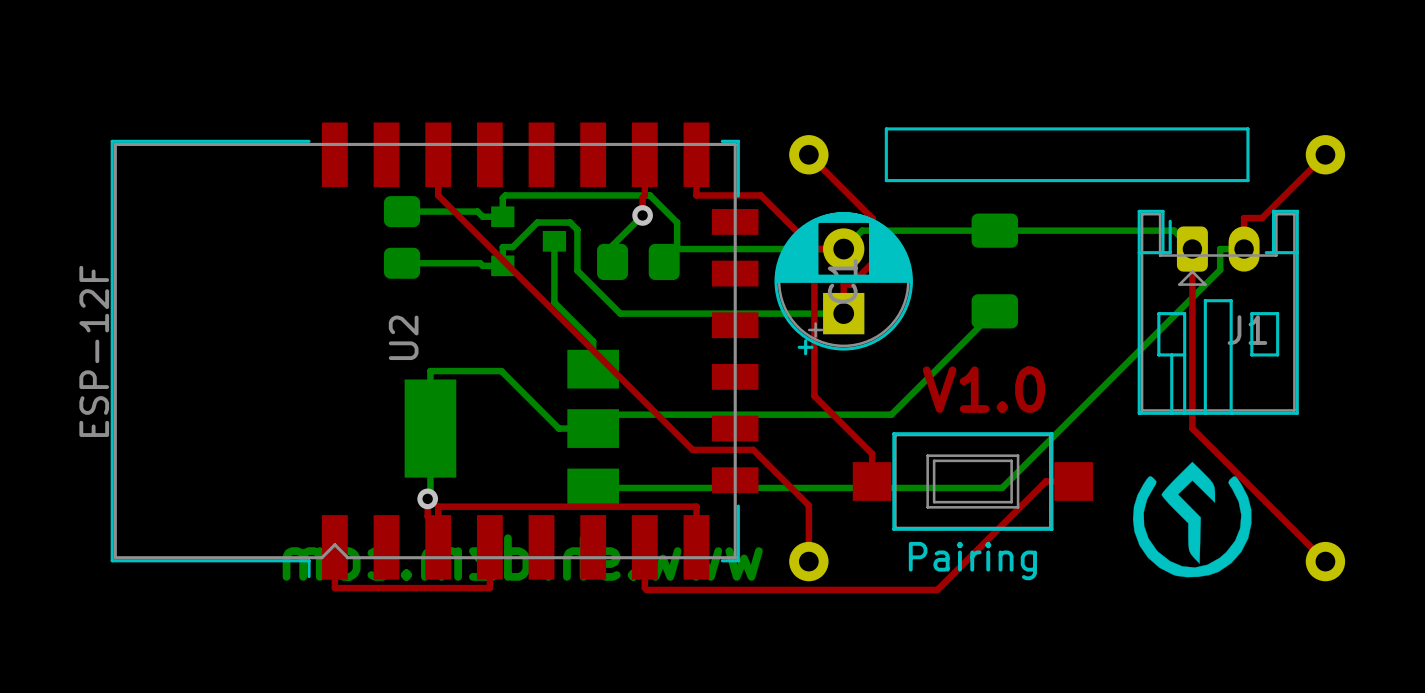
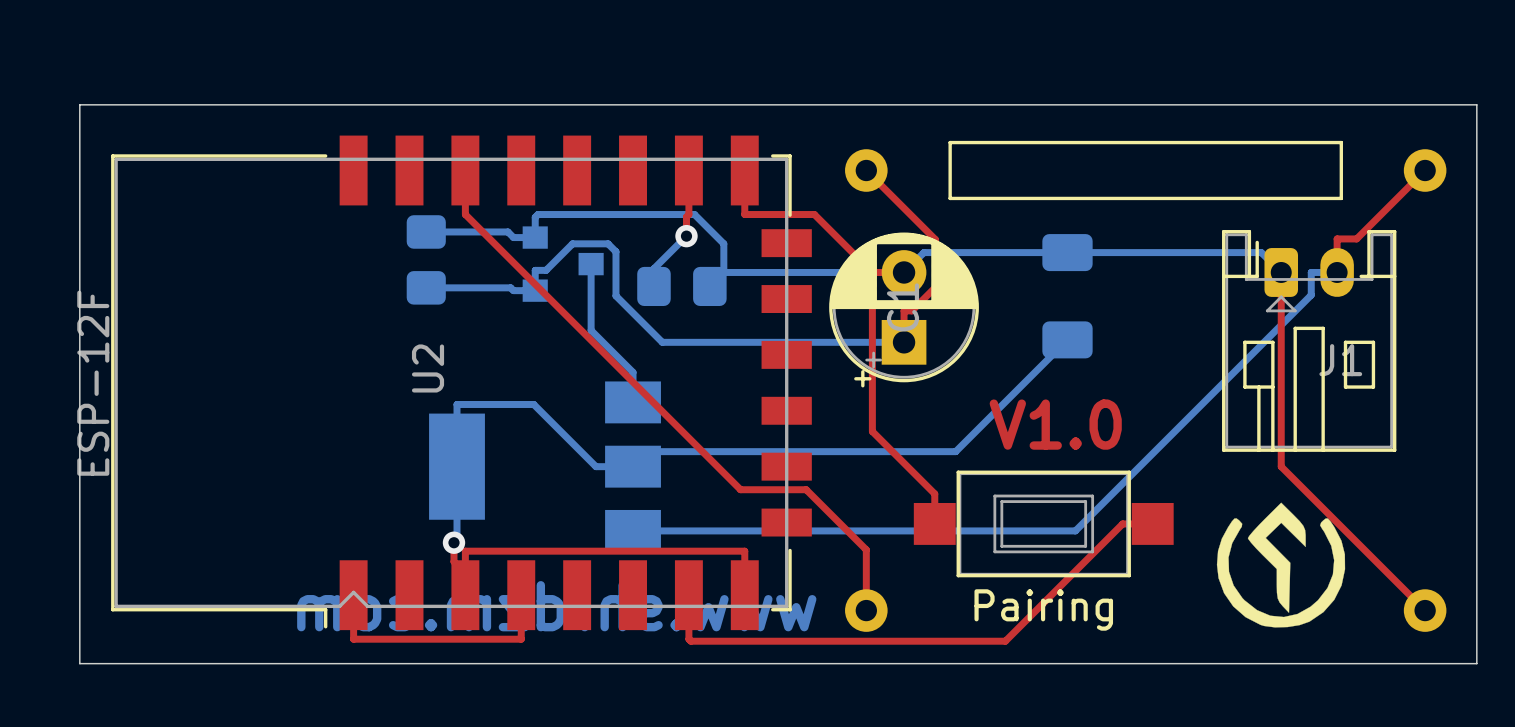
board edge: none -> (79, 104) (79, 663) (1476, 663) (1476, 104) (79, 104)

